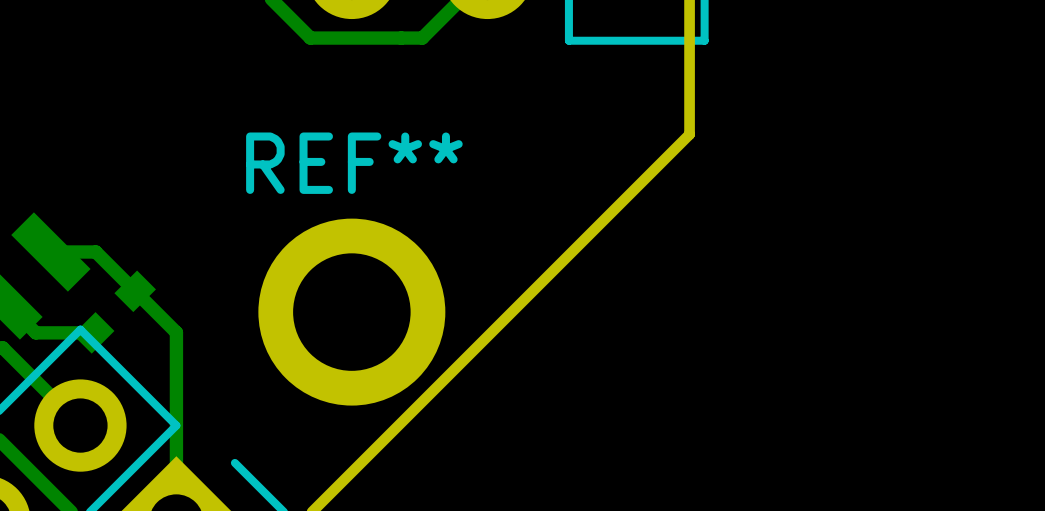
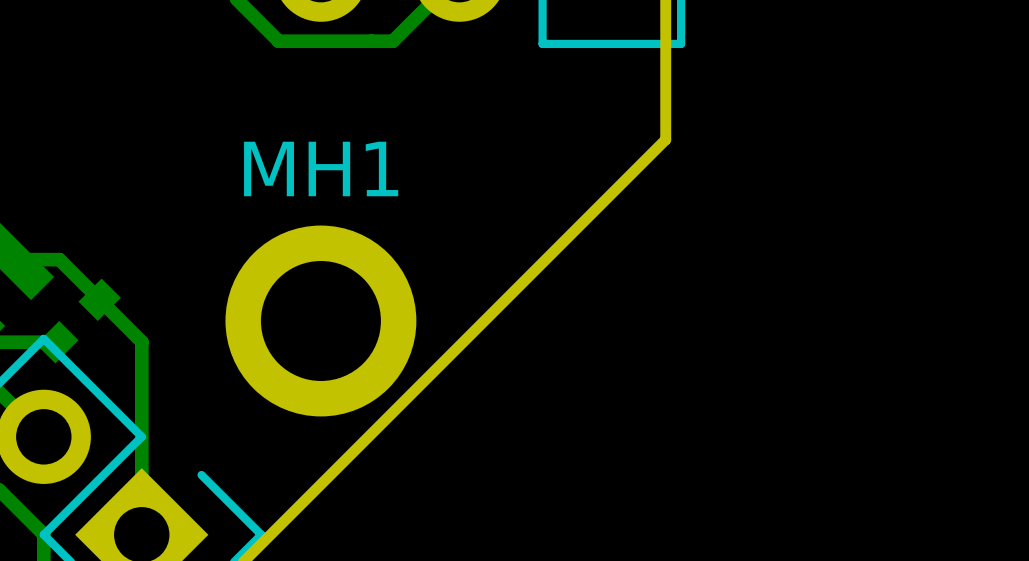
REF** name: REF** (354, 163) -> MH1 (321, 168)

